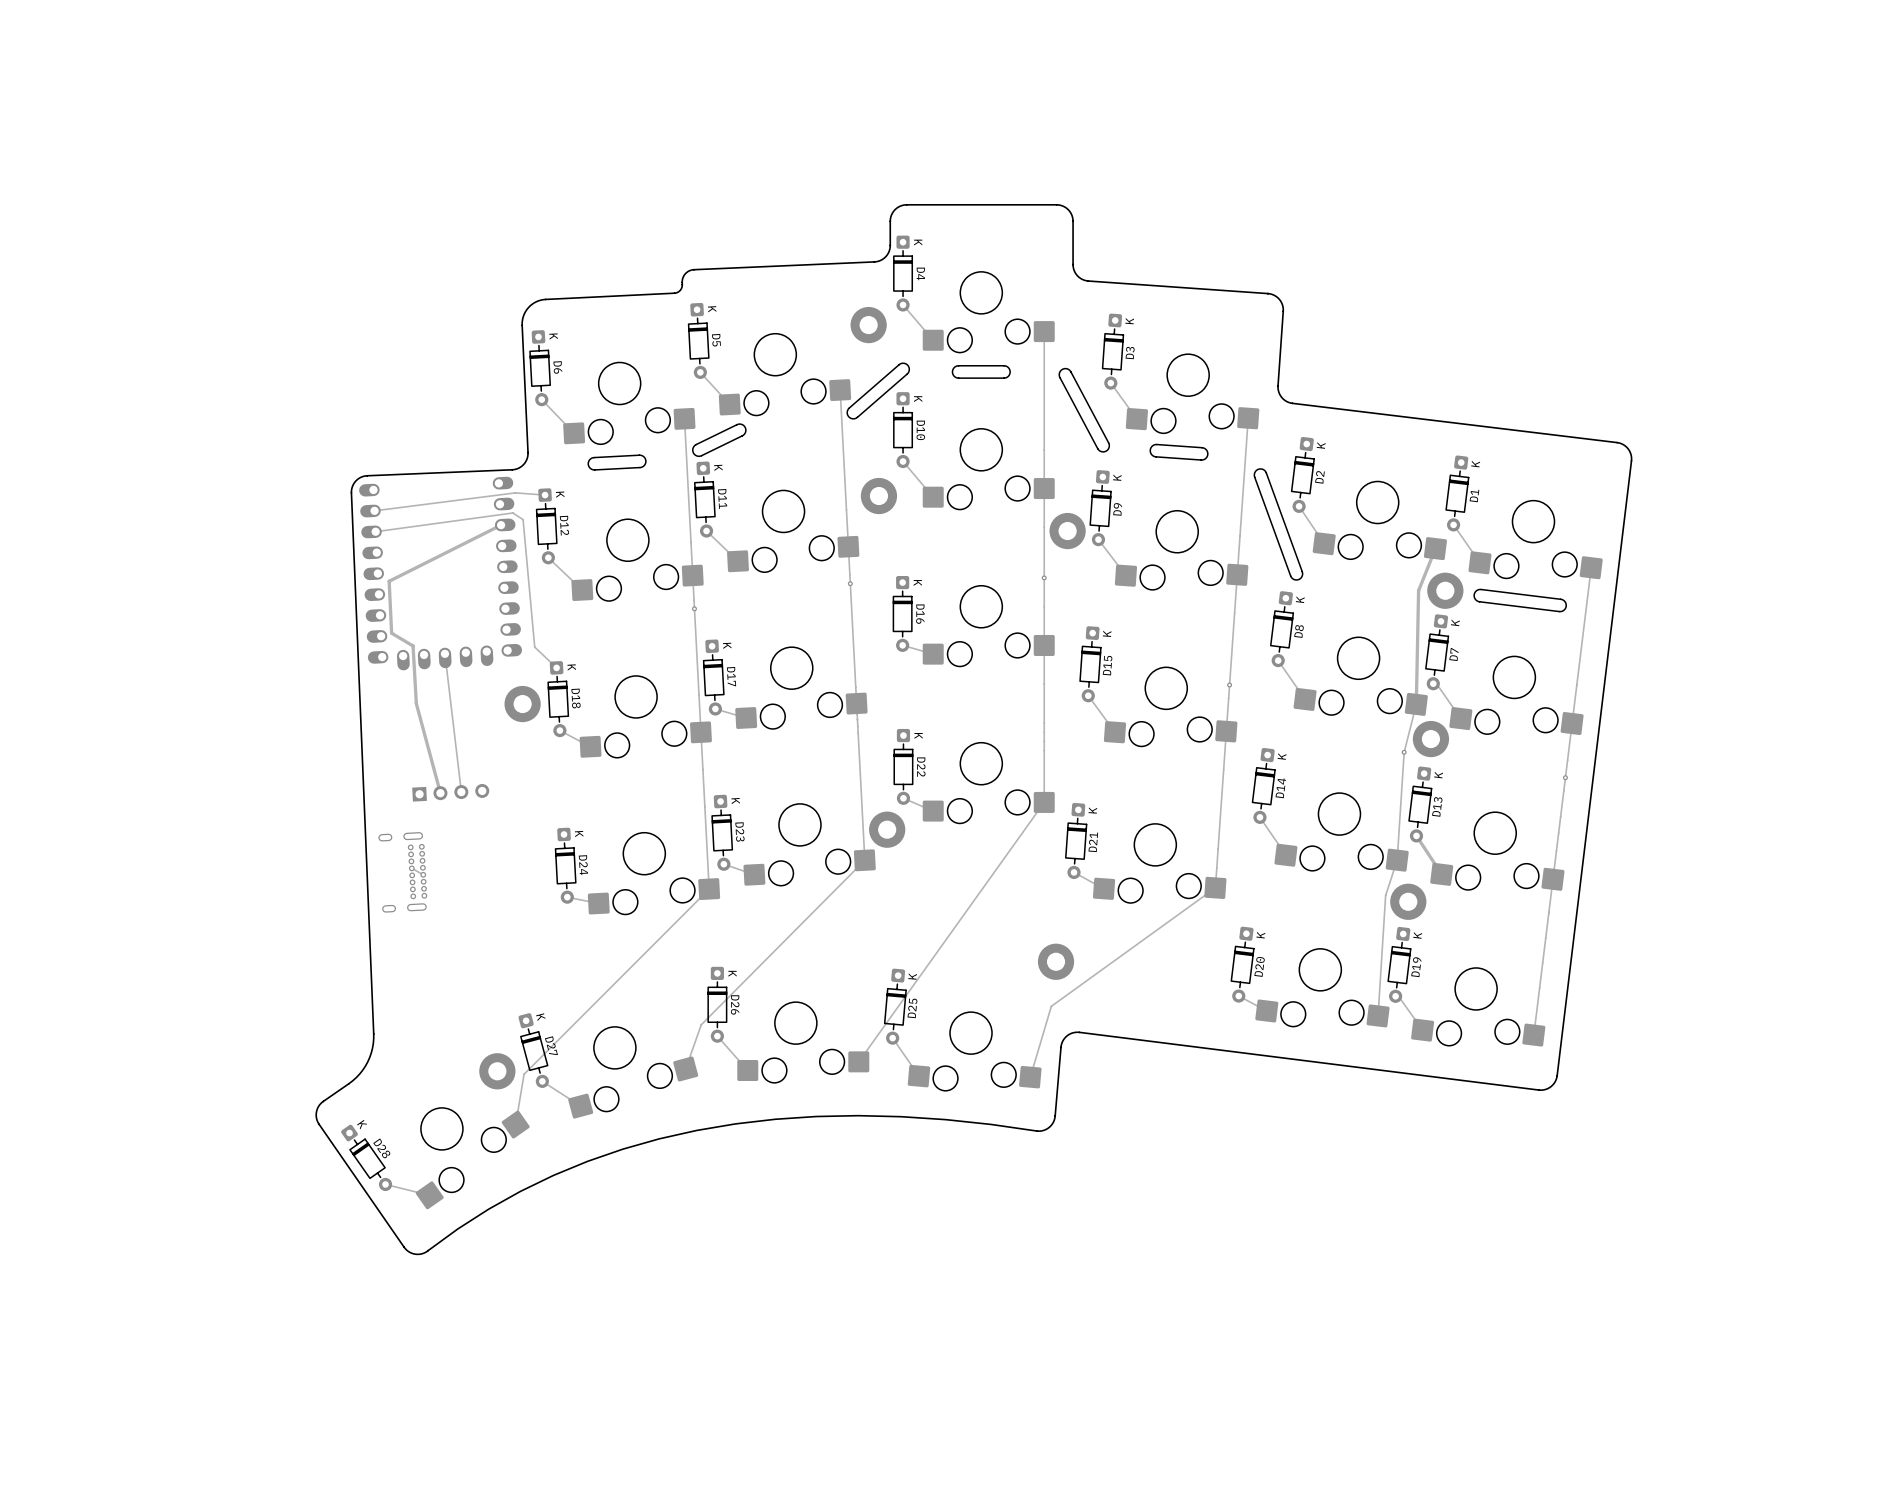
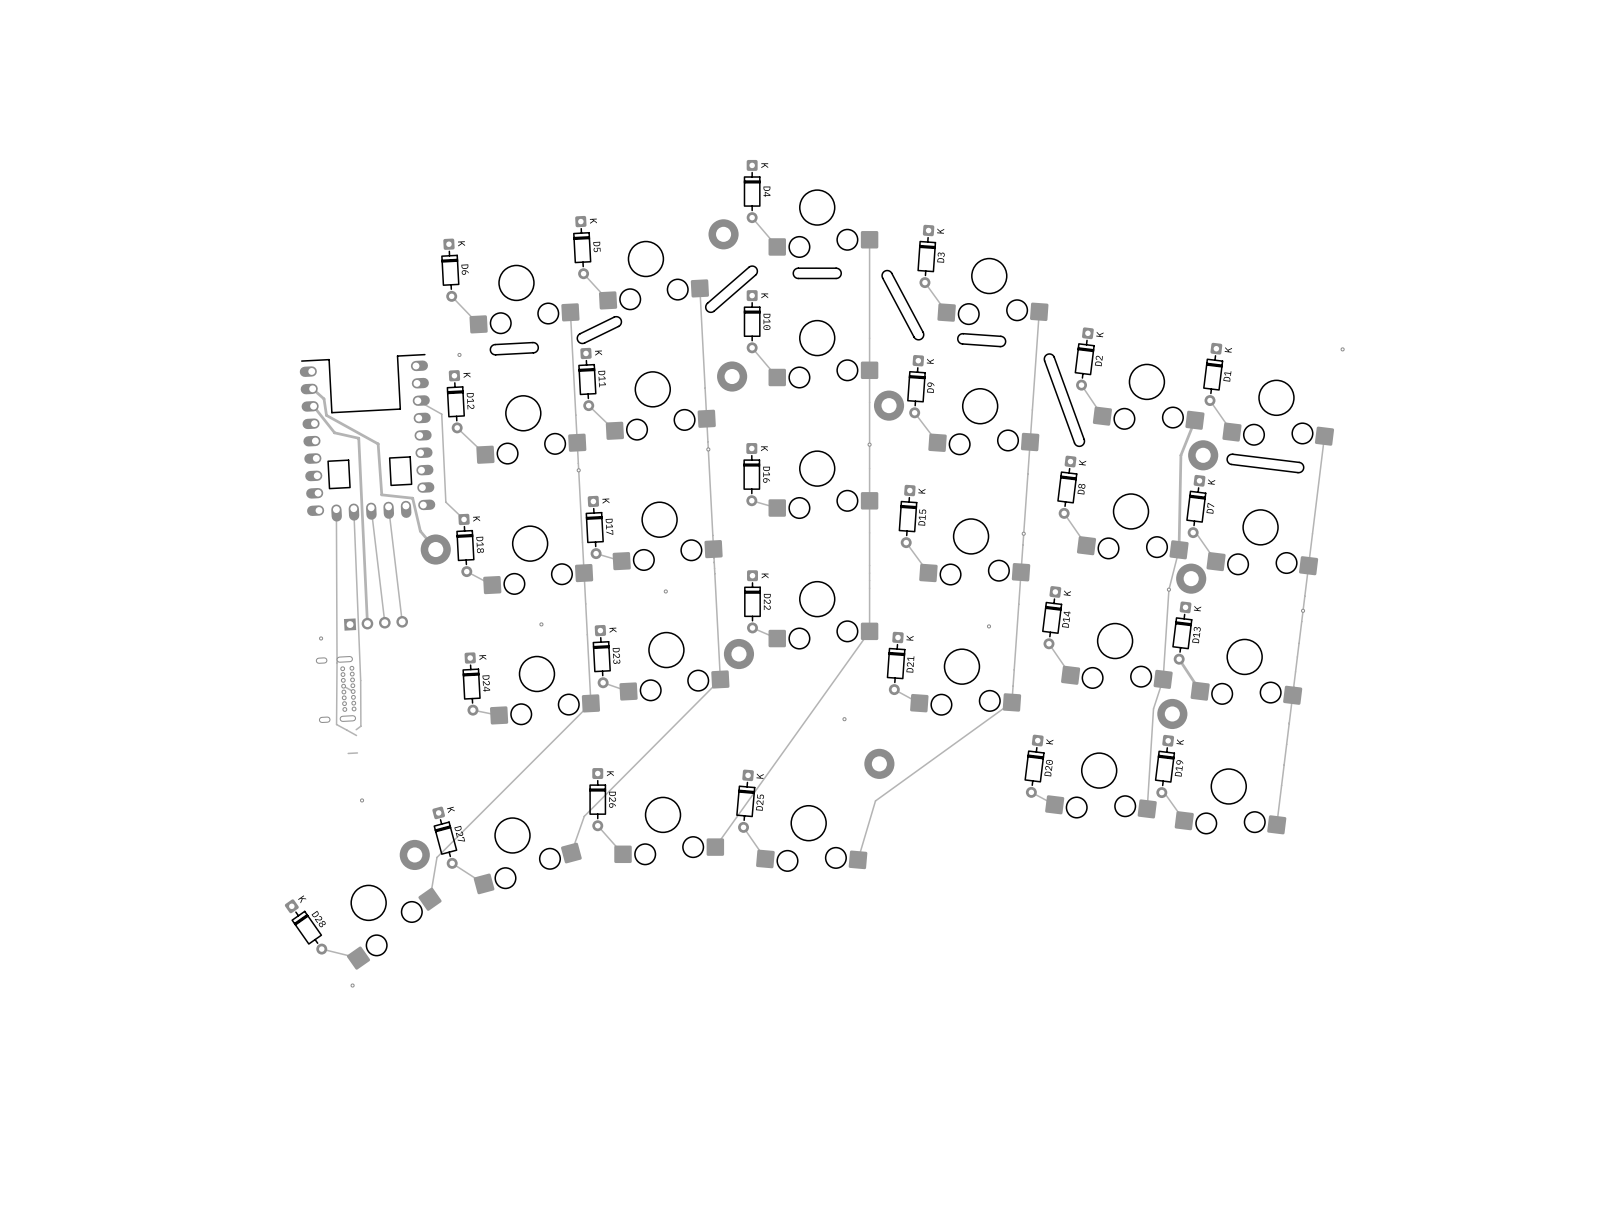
board edge: (1056, 204) (904, 204) (896, 208) (891, 215) (889, 249) (885, 256) (878, 261) (692, 269) (684, 274) (681, 288) (675, 293) (537, 301) (526, 309) (522, 322) (528, 452) (523, 464) (512, 469) (365, 476) (354, 482) (351, 492) (373, 1038) (369, 1057) (362, 1070) (352, 1080) (321, 1102) (316, 1109) (316, 1116) (319, 1124) (408, 1251) (417, 1254) (424, 1252) (488, 1209) (553, 1175) (622, 1149) (696, 1130) (775, 1119) (858, 1115) (945, 1119) (1043, 1130) (1050, 1125) (1054, 1118) (1061, 1043) (1067, 1035) (1075, 1032) (1538, 1090) (1547, 1088) (1554, 1082) (1557, 1075) (1631, 460) (1629, 450) (1624, 445) (1617, 442) (1288, 402) (1280, 395) (1278, 387) (1283, 309) (1277, 297) (1267, 293) (1082, 279) (1076, 274) (1073, 266) (1071, 215) (1064, 207) (1056, 204) -> none
via: none -> (1342, 349)
via: none -> (459, 354)
part footprint: [359, 476, 523, 671] -> [299, 354, 436, 522]
track: (545, 495) (515, 492) (374, 510) -> (435, 549) (420, 531) (412, 498) (381, 494) (378, 443) (326, 415) (324, 398) (312, 388)
track: (501, 525) (389, 581) (391, 633) (413, 645) (416, 703) (440, 793) -> (313, 406) (334, 432) (358, 438) (367, 623)
track: (375, 531) (512, 512) (523, 519) (534, 647) -> (417, 400) (441, 414) (445, 502)
track: none -> (388, 506) (402, 621)
track: none -> (353, 508) (360, 680) (360, 726) (356, 729)
track: none -> (336, 509) (336, 724) (356, 735)
via: none -> (665, 591)
via: none -> (541, 624)
via: none -> (988, 626)
via: none -> (321, 638)
via: none -> (844, 719)
track: none -> (357, 752) (348, 753)
via: none -> (362, 800)
via: none -> (352, 985)

